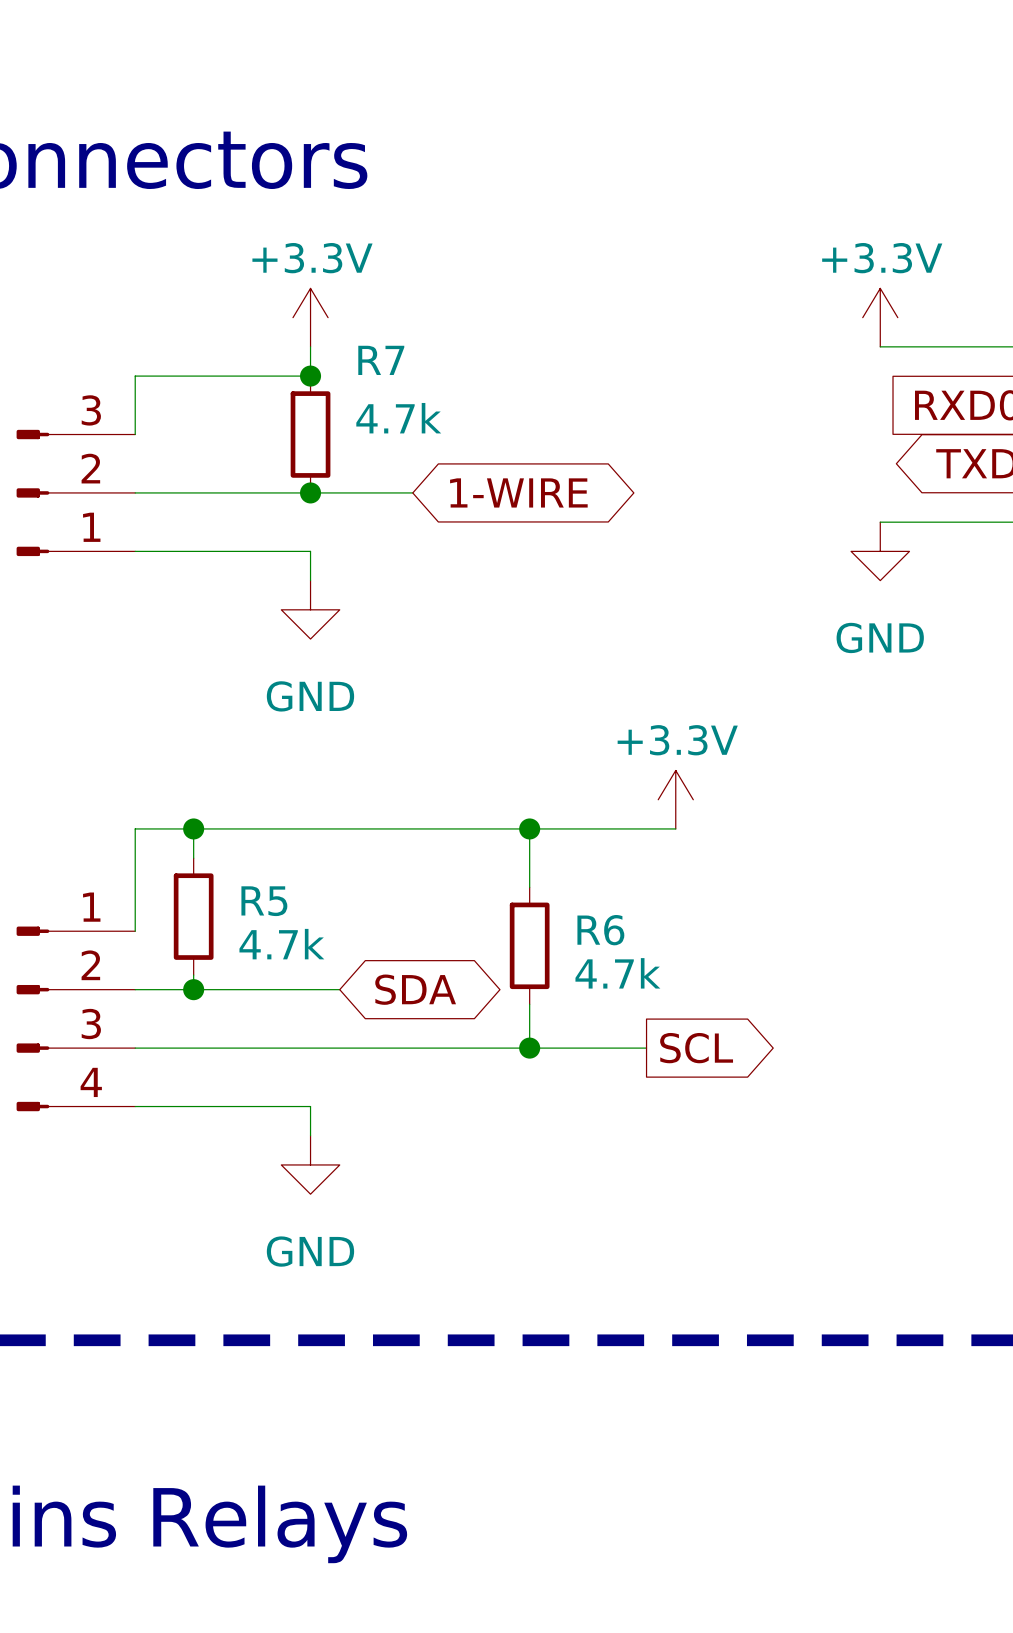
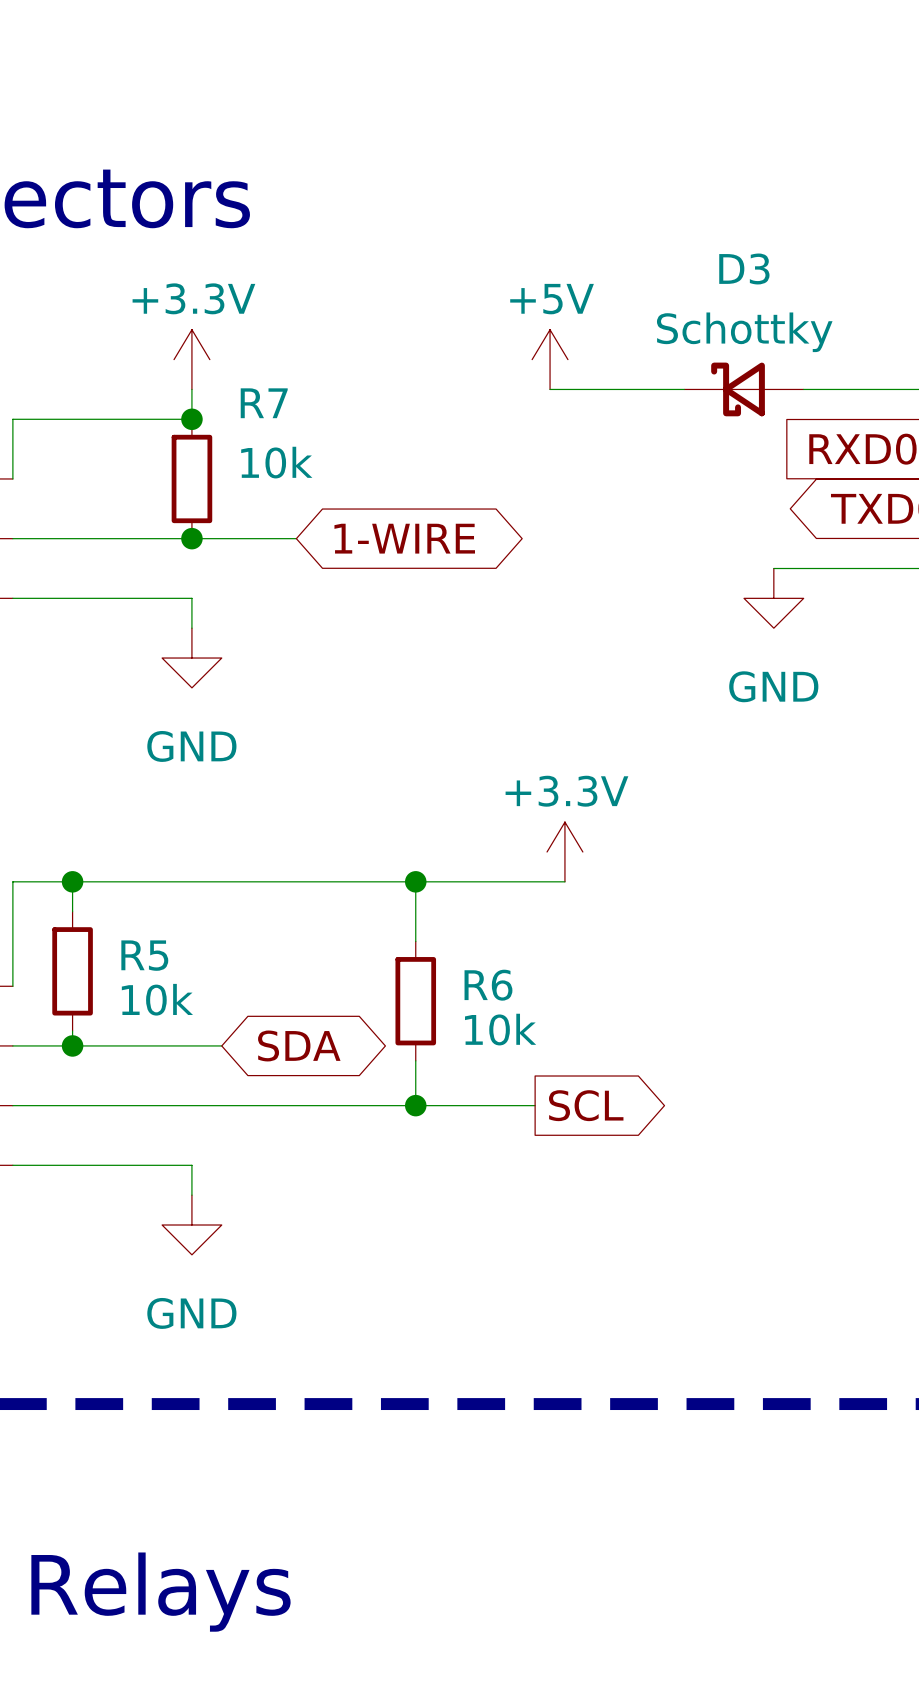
power symbol: none -> +5V (550, 359)
power symbol: +3.3V (880, 317) -> none
wire: none -> (550, 389) (684, 389)
D3: none -> Schottky (744, 389)
R7 value: 4.7k (398, 418) -> 10k (276, 462)
R5 value: 4.7k (281, 944) -> 10k (157, 999)
R6 value: 4.7k (617, 973) -> 10k (500, 1029)

